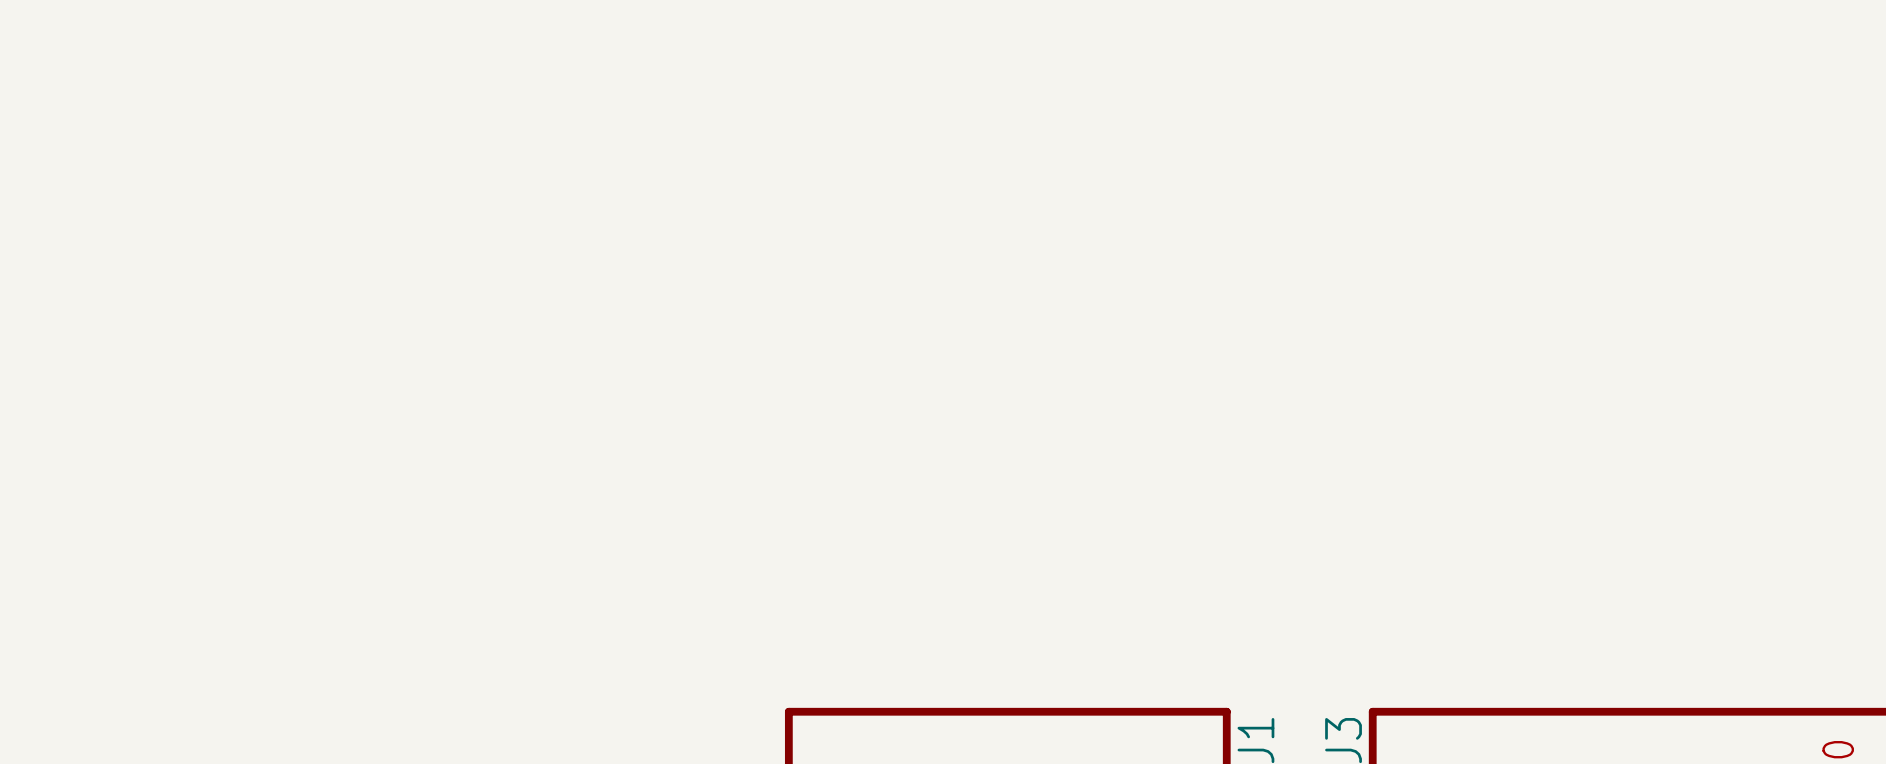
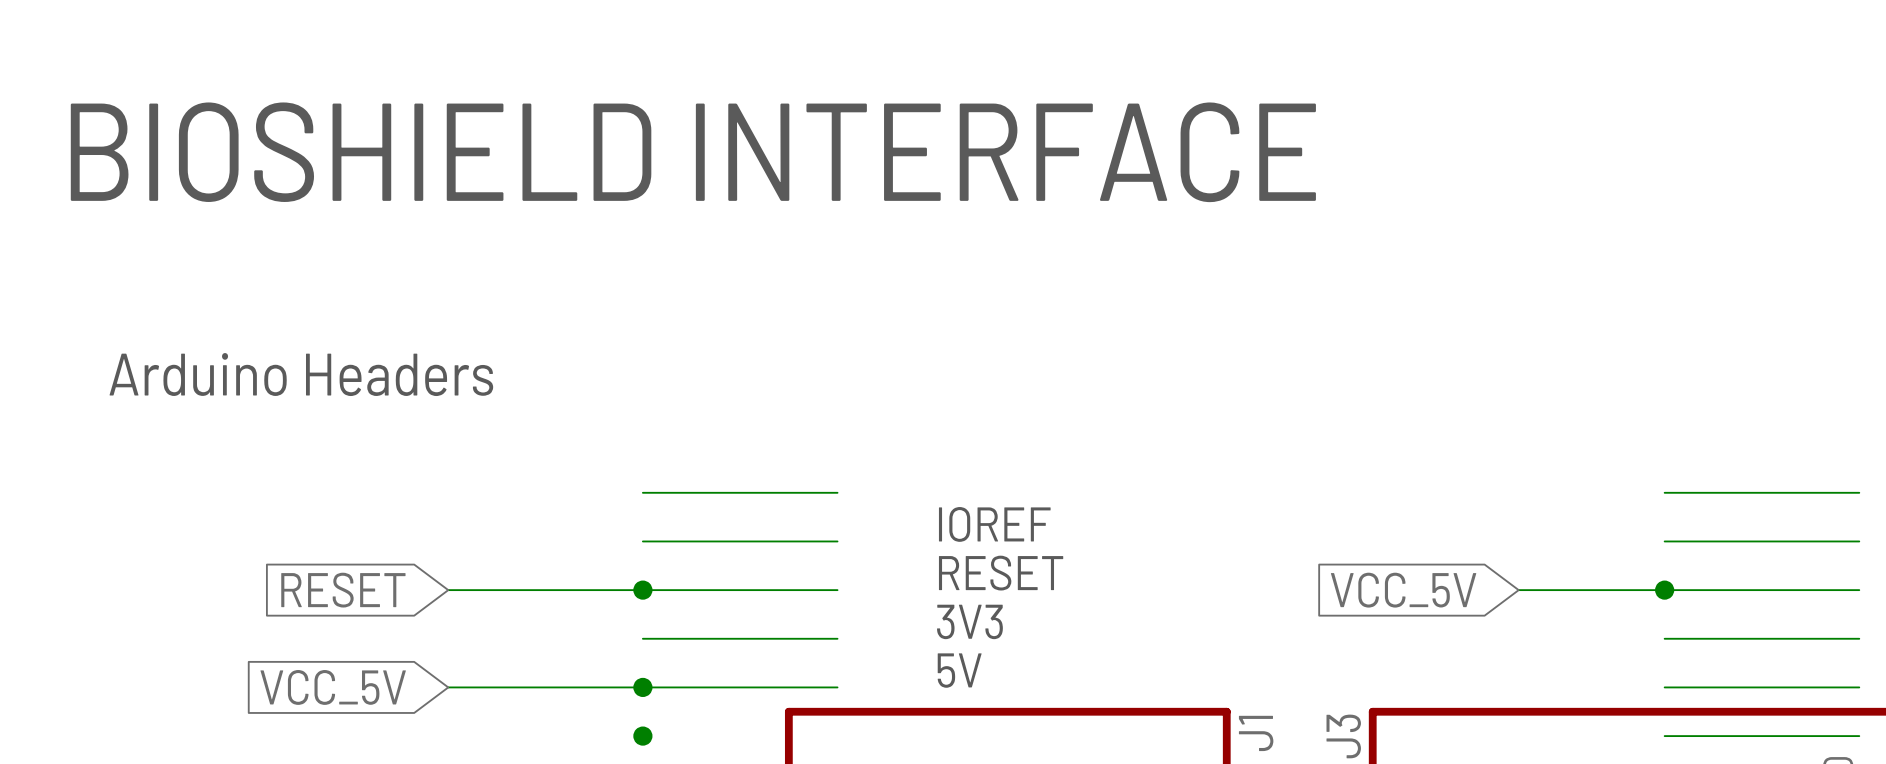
text: none -> BIOSHIELD INTERFACE (693, 152)
text: none -> Arduino Headers (301, 374)
wire: none -> (642, 492) (837, 492)
wire: none -> (1664, 492) (1859, 492)
text: none -> IOREF (994, 524)
wire: none -> (642, 541) (837, 541)
wire: none -> (1664, 541) (1859, 541)
text: none -> RESET (1001, 573)
global label: none -> RESET (343, 590)
wire: none -> (448, 590) (837, 590)
junction: none -> (642, 590)
wire: none -> (1518, 590) (1859, 590)
junction: none -> (1664, 590)
global label: none -> VCC_5V (1403, 590)
text: none -> 3V3 (969, 621)
wire: none -> (642, 638) (837, 638)
wire: none -> (1664, 638) (1859, 638)
text: none -> 5V (959, 670)
wire: none -> (448, 687) (837, 687)
junction: none -> (642, 687)
wire: none -> (1664, 687) (1859, 687)
global label: none -> VCC_5V (333, 687)
junction: none -> (642, 736)
wire: none -> (1664, 736) (1859, 736)

